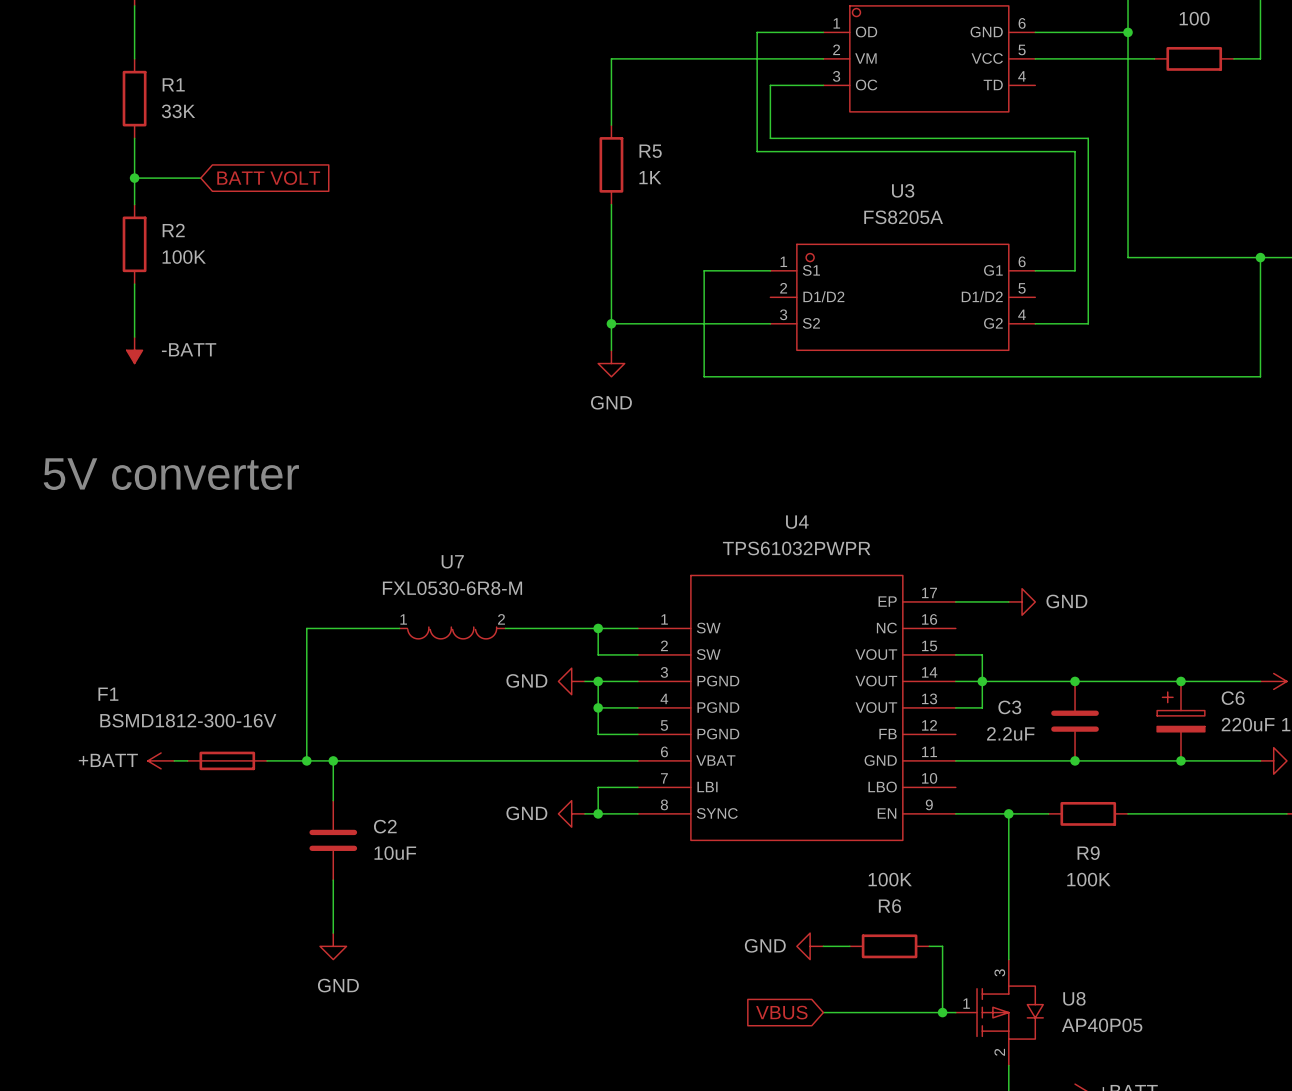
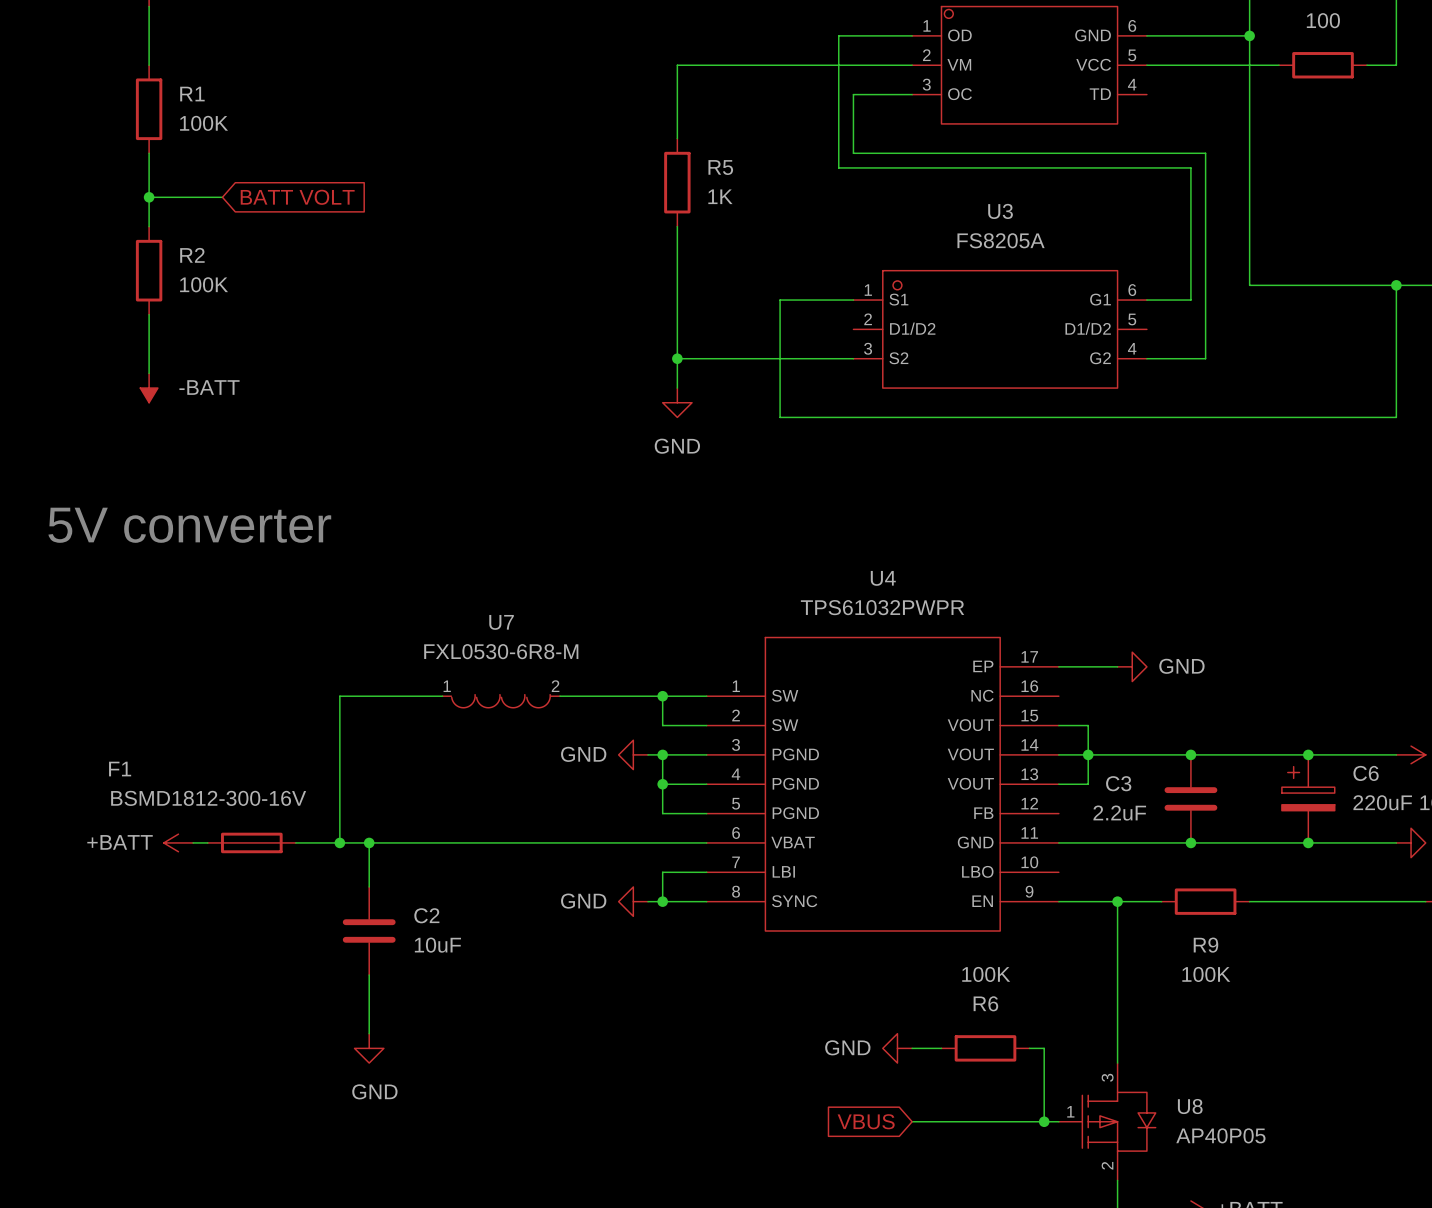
R1 value: 33K (178, 111) -> 100K (204, 123)

